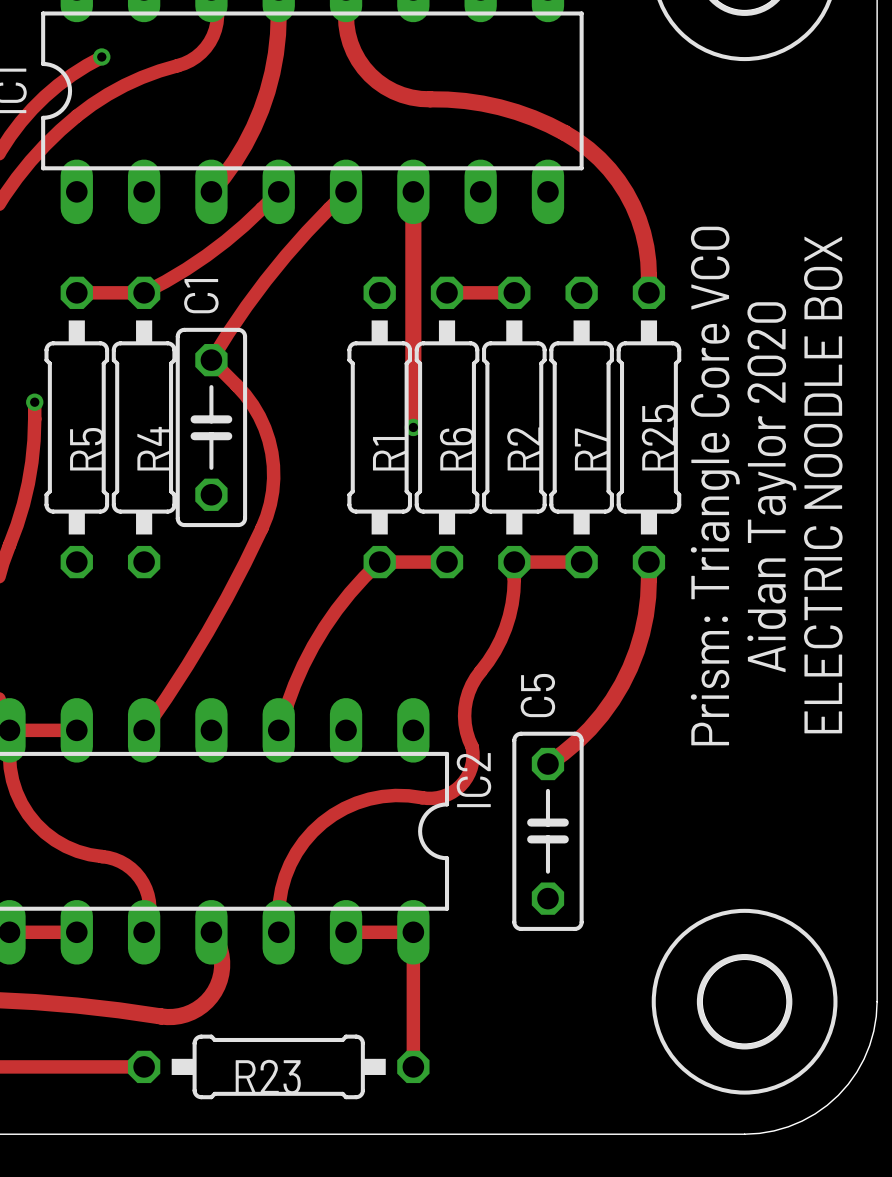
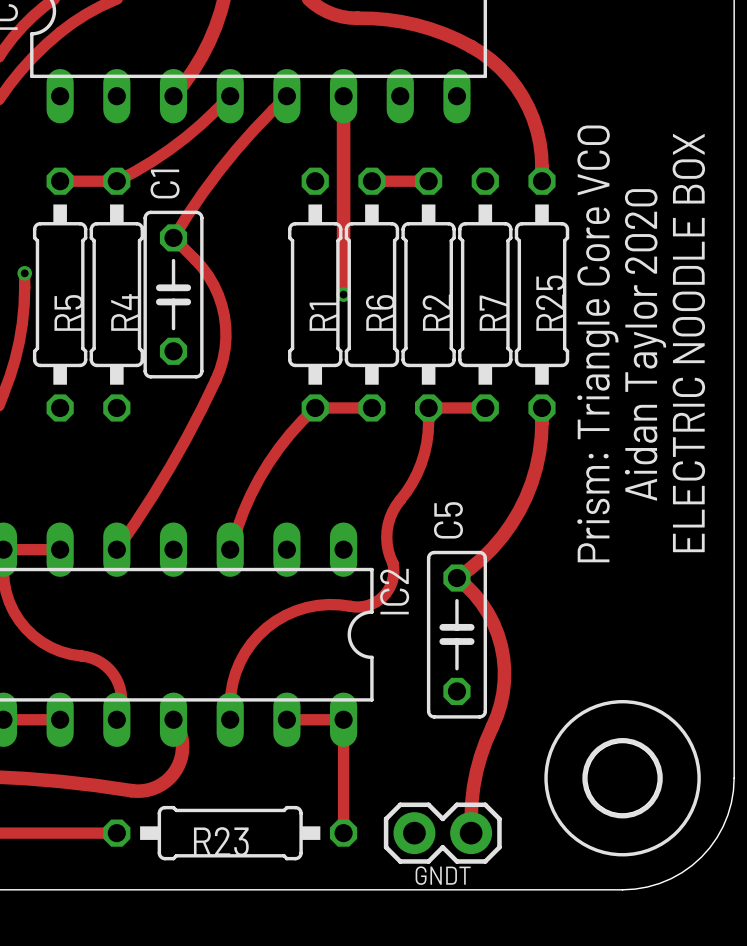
track: none -> (456, 578) (474, 594) (488, 613) (498, 634) (504, 669) (500, 704) (476, 771) (471, 803) (471, 833)
GNDT: none -> (442, 833)

